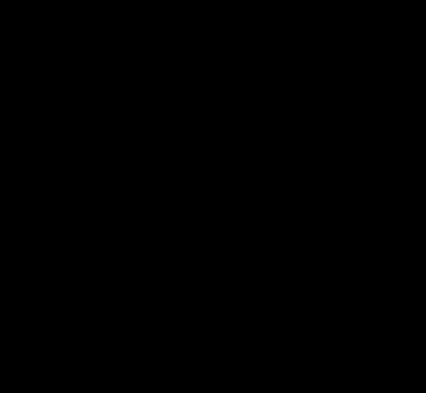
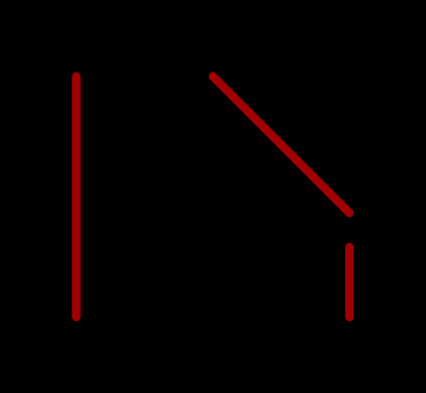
track: none -> (76, 76) (76, 317)
track: none -> (212, 76) (349, 212)
track: none -> (349, 247) (349, 317)

